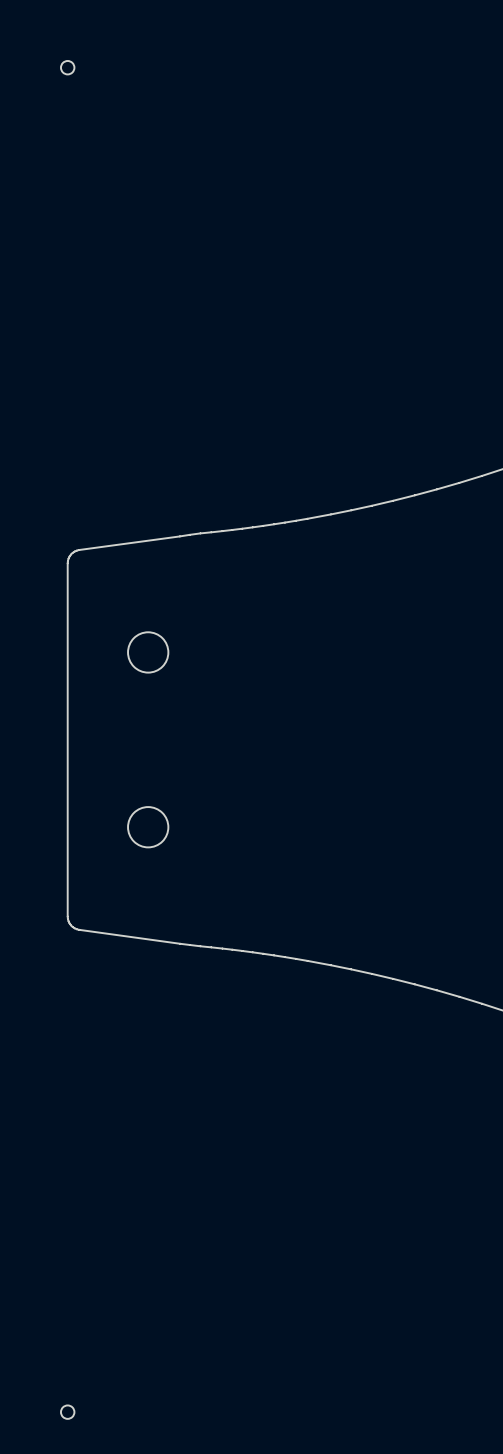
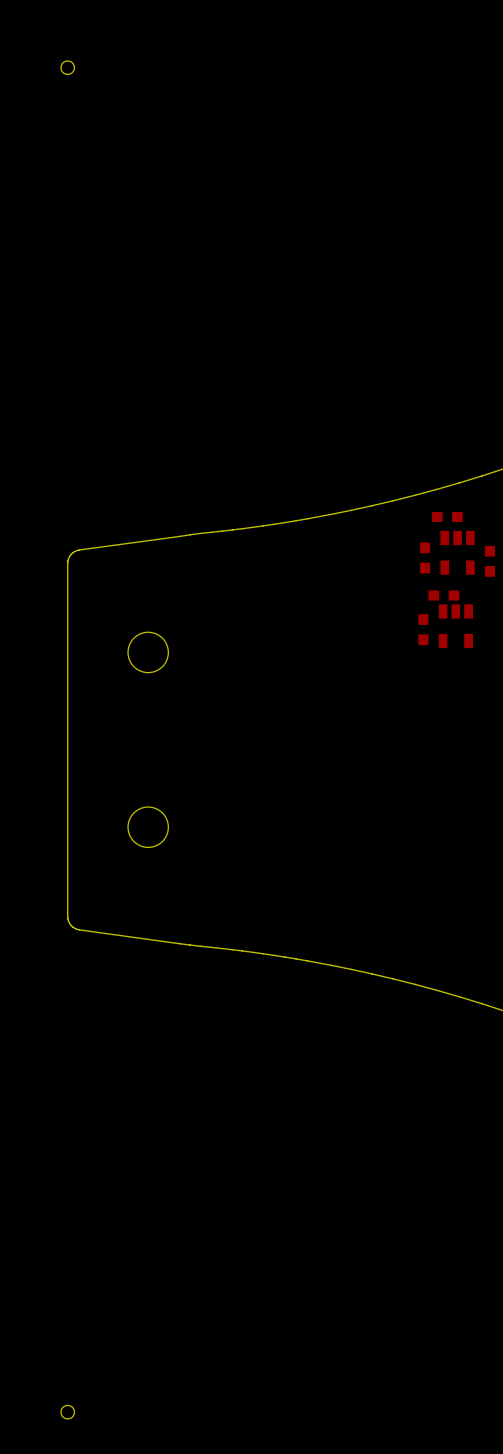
part: none -> (447, 516)
part: none -> (457, 552)
part: none -> (425, 557)
part: none -> (490, 561)
part: none -> (443, 595)
part: none -> (455, 626)
part: none -> (423, 629)

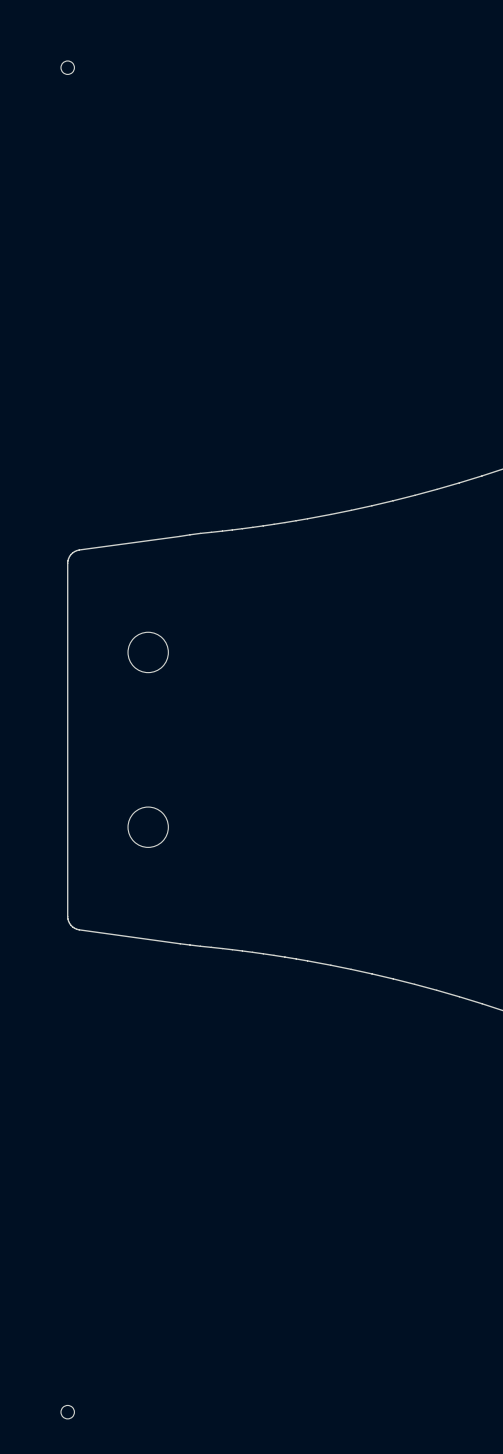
part: (447, 516) -> none
part: (457, 552) -> none
part: (425, 557) -> none
part: (490, 561) -> none
part: (443, 595) -> none
part: (455, 626) -> none
part: (423, 629) -> none

